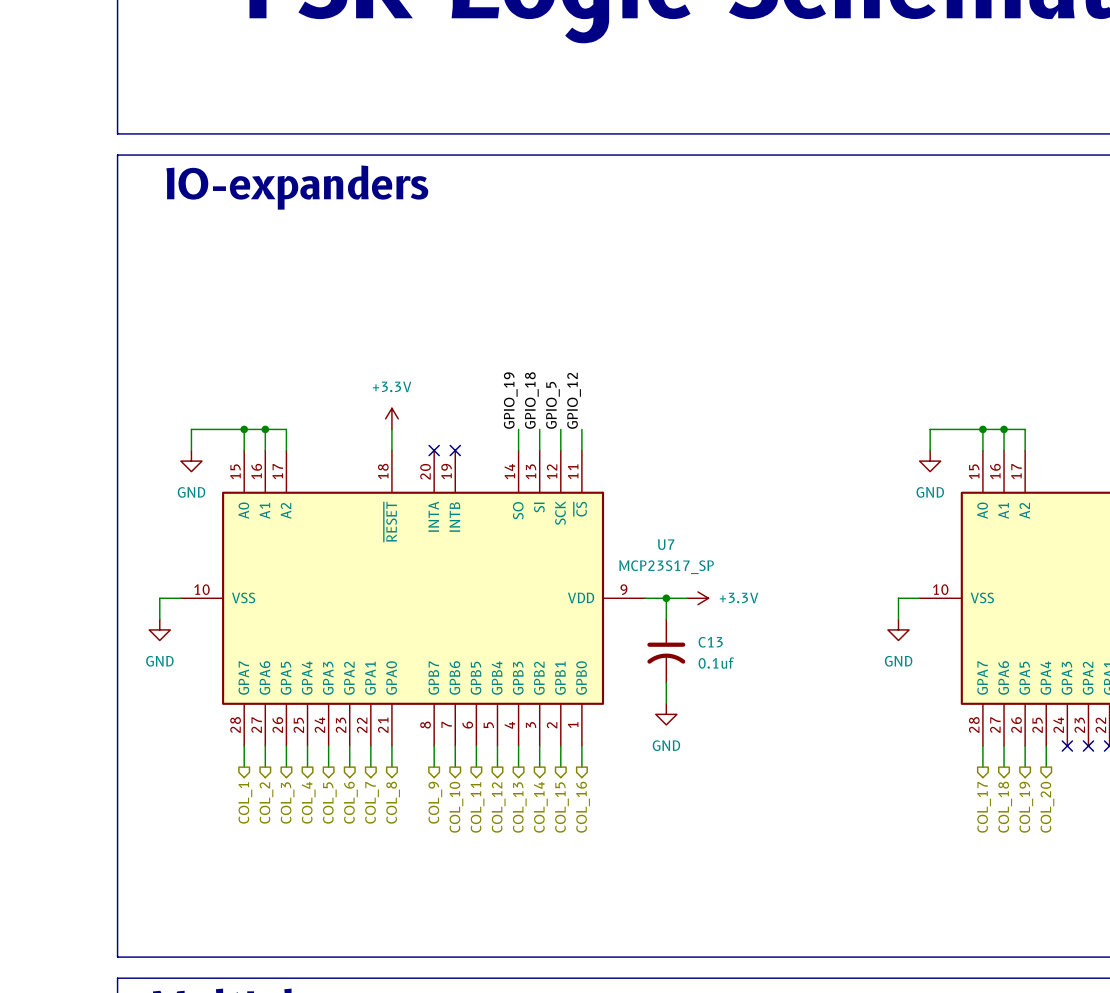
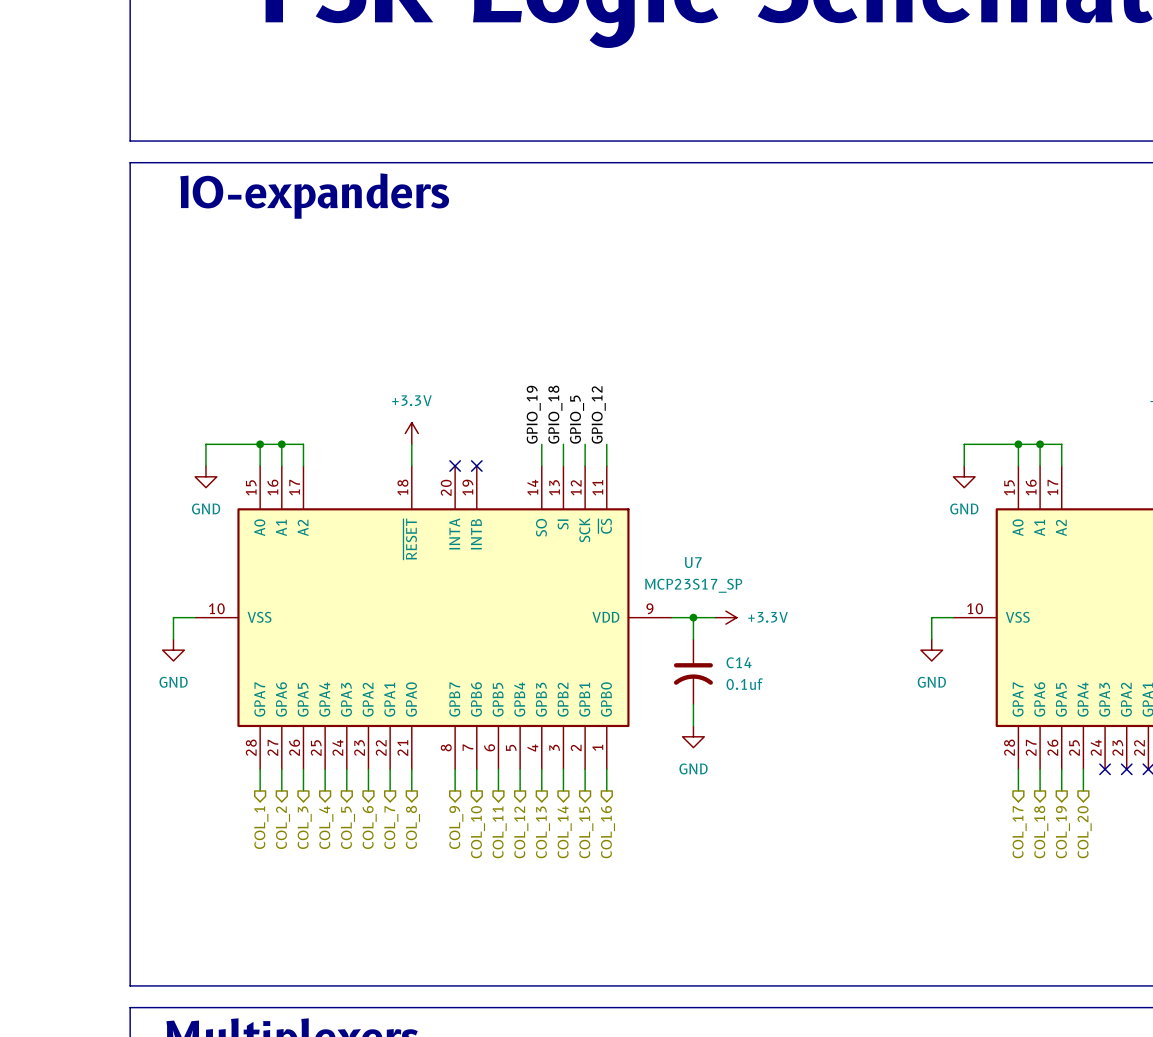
C13 name: C13 (710, 642) -> C14 (739, 662)

